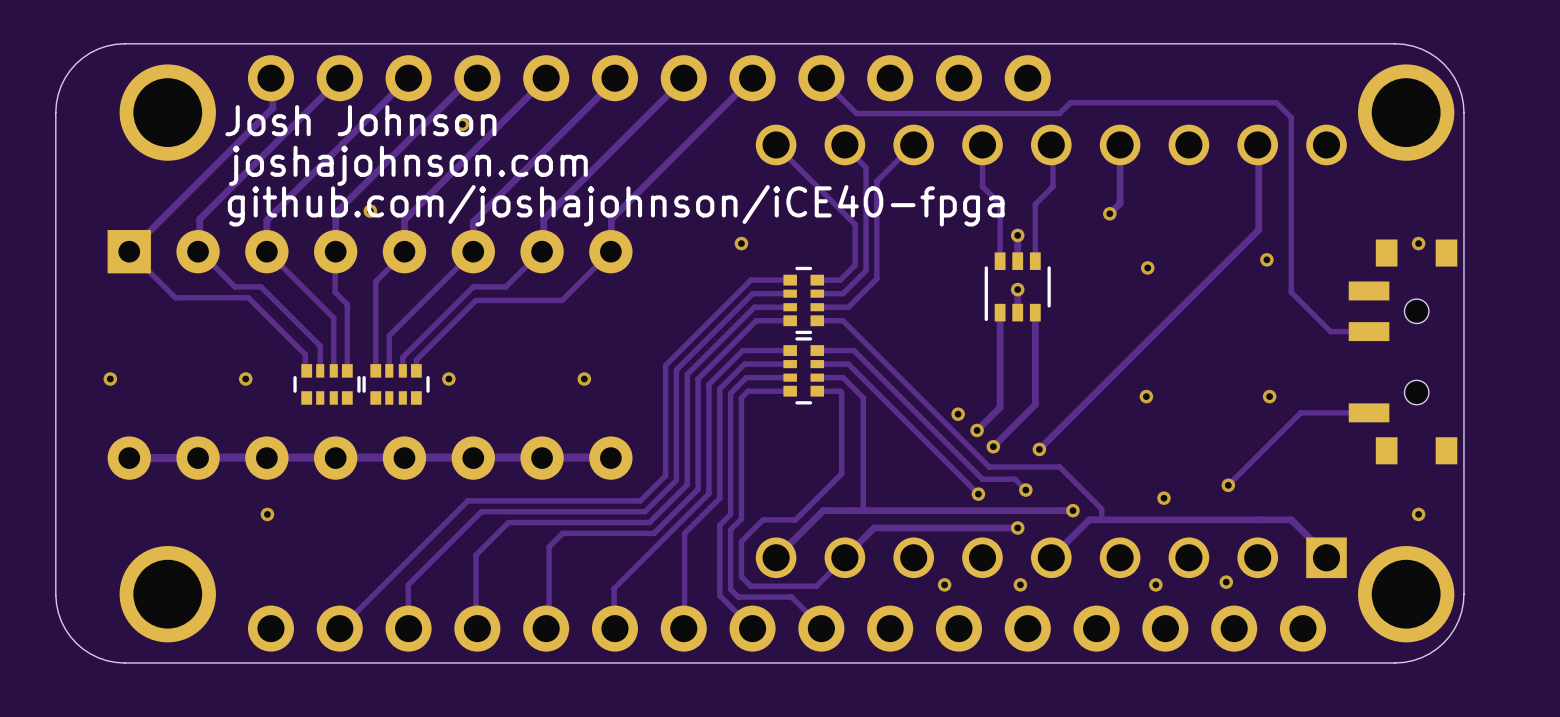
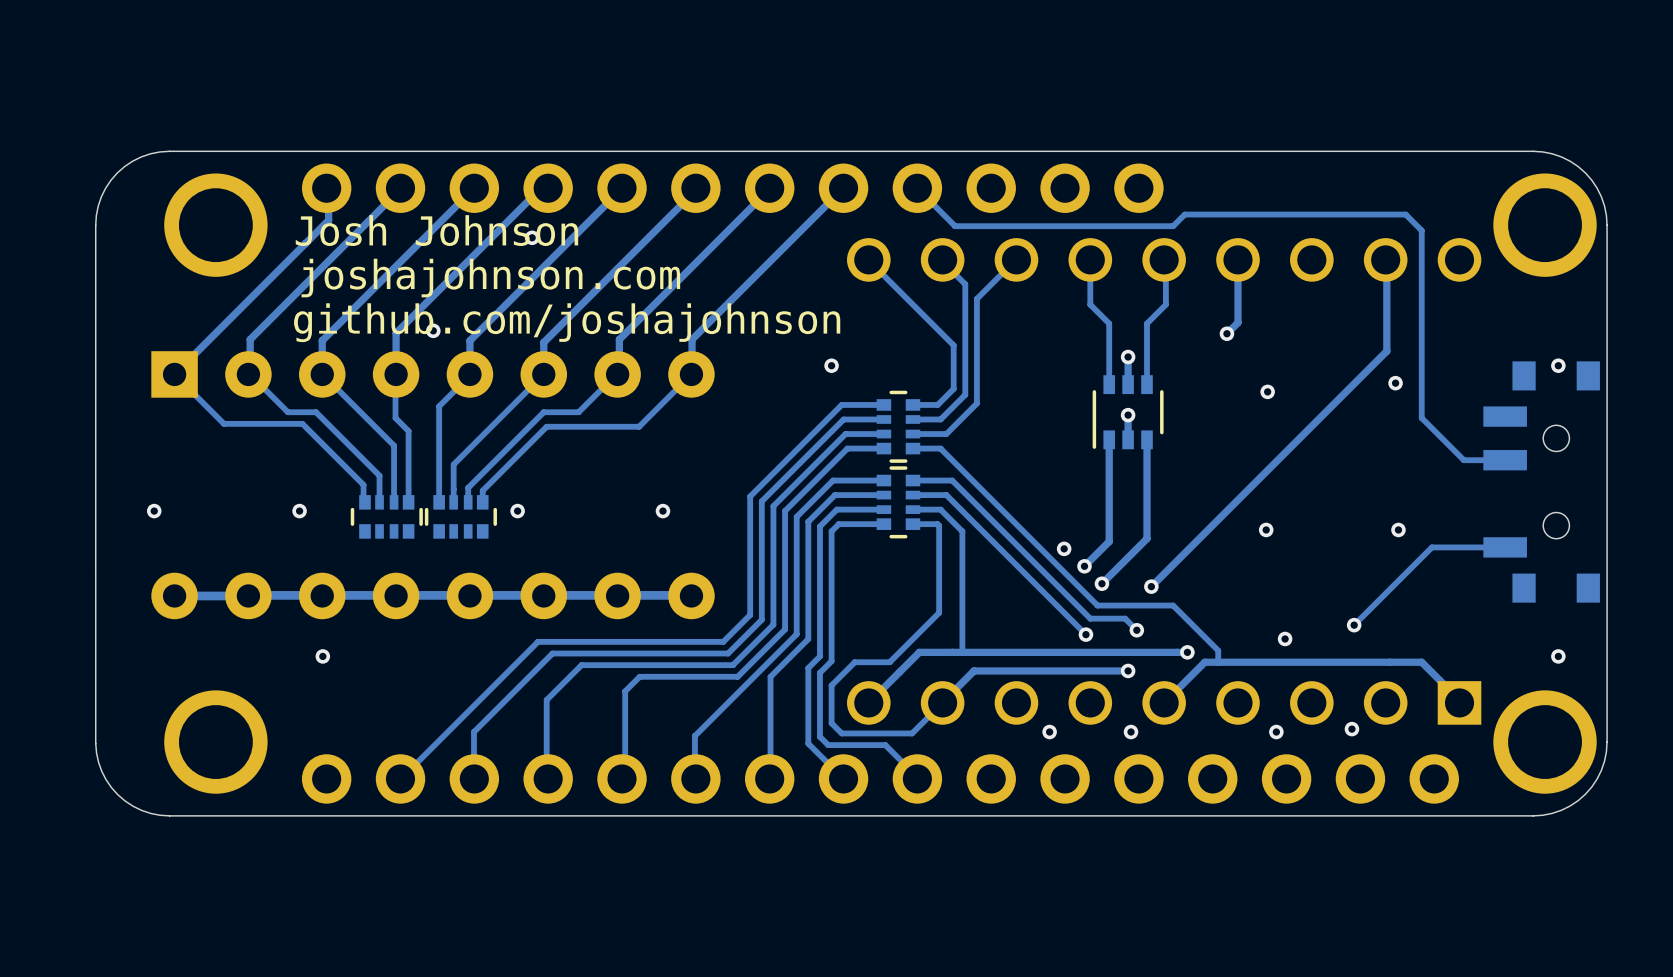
drawing: none -> [294, 215, 841, 343]
drawing: [225, 105, 1005, 227] -> none

